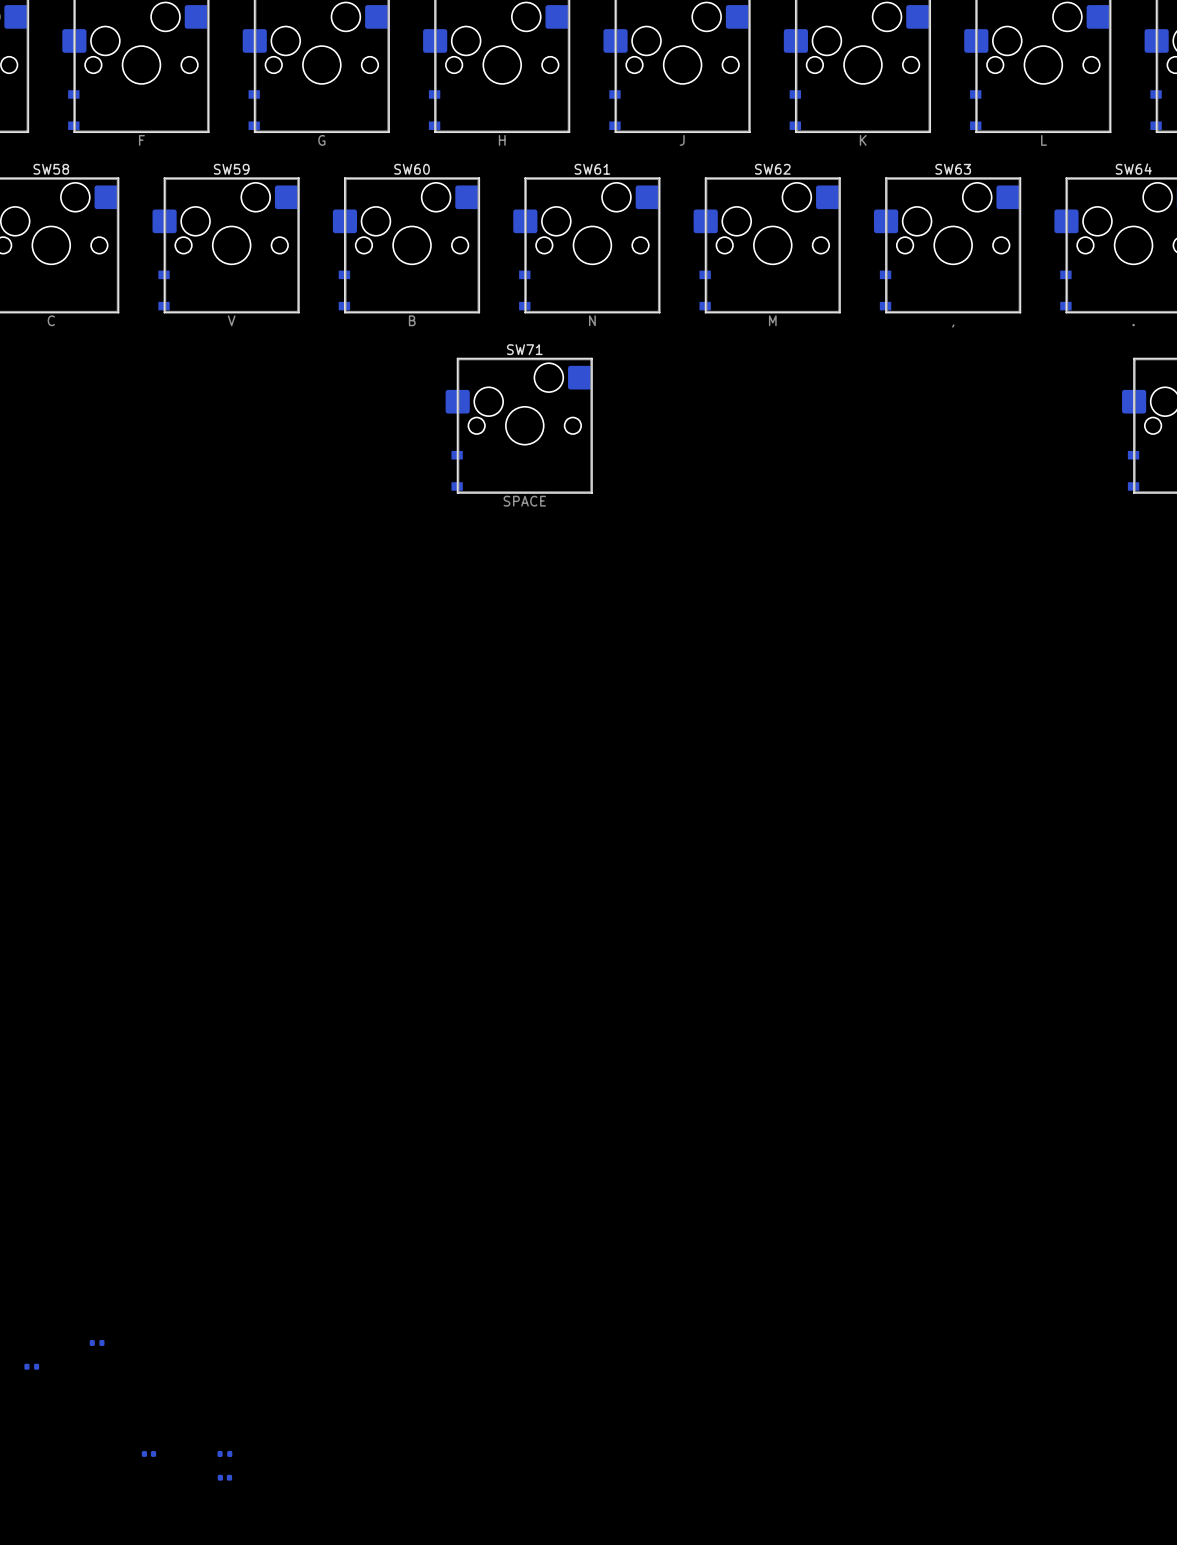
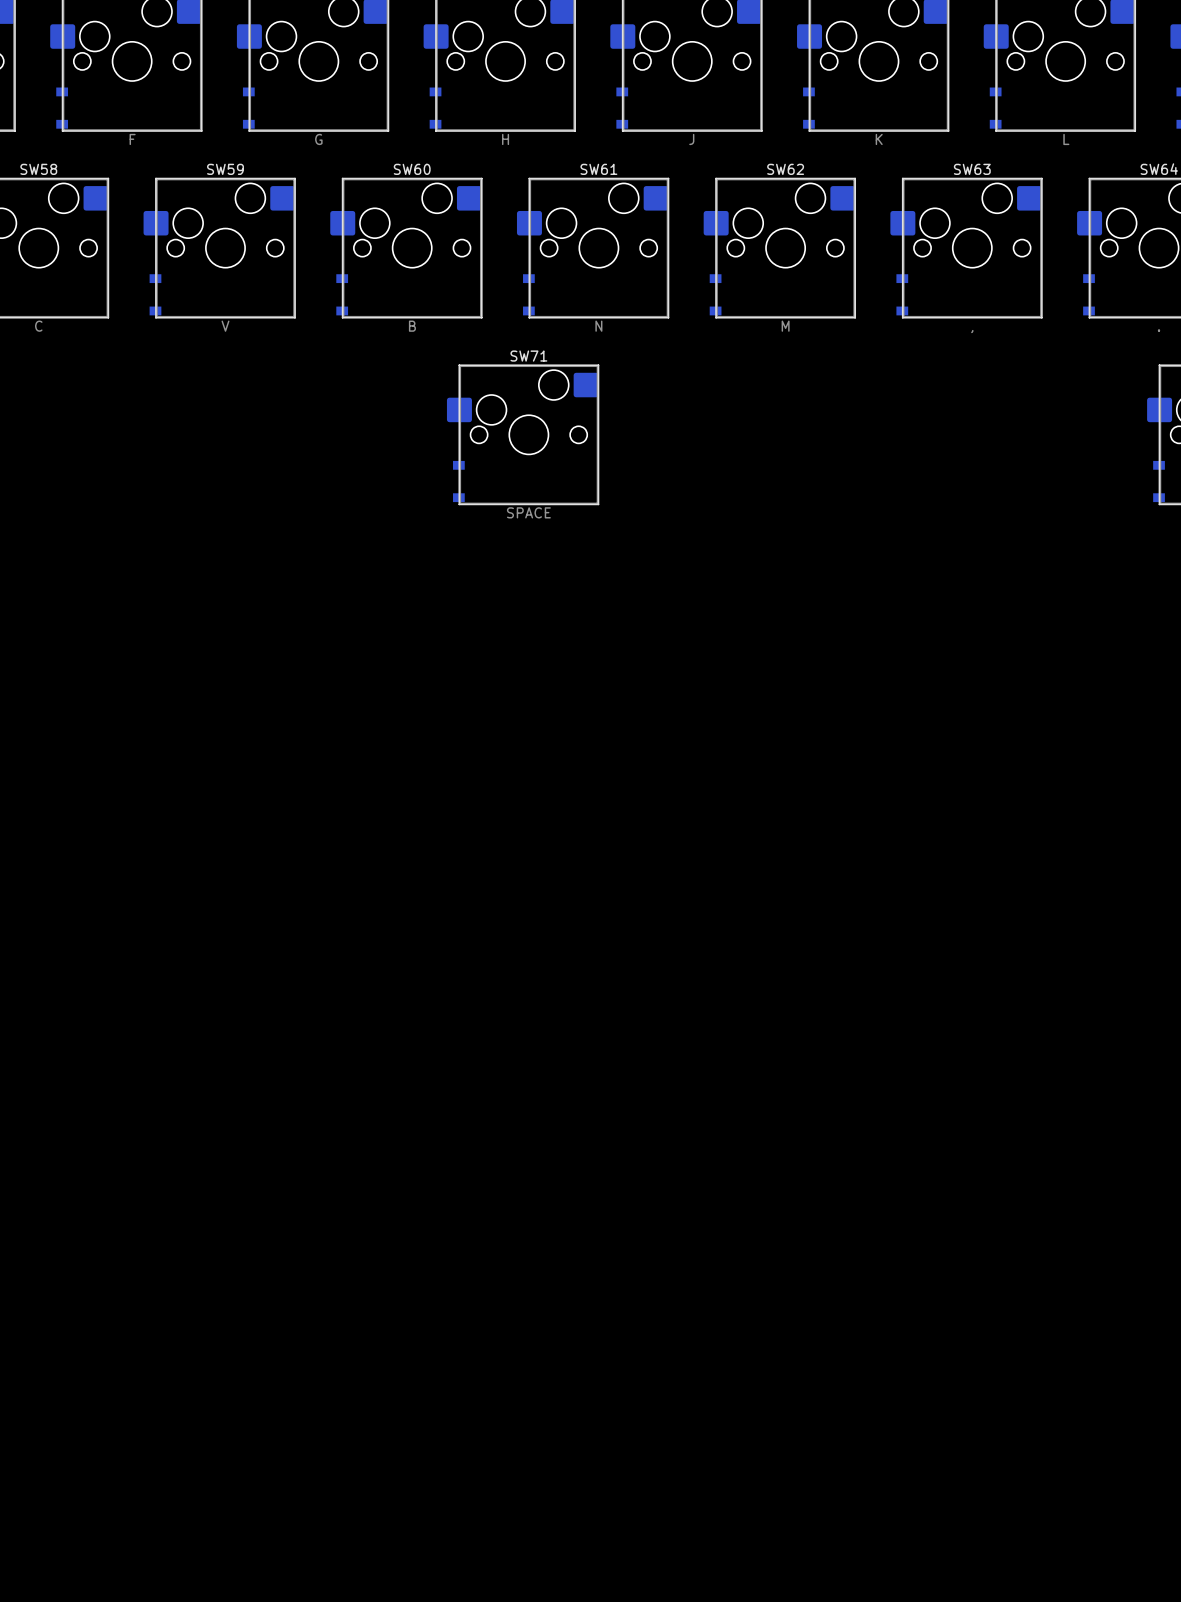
part: (97, 1342) -> none
part: (31, 1366) -> none
part: (148, 1453) -> none
part: (224, 1453) -> none
part: (224, 1477) -> none

